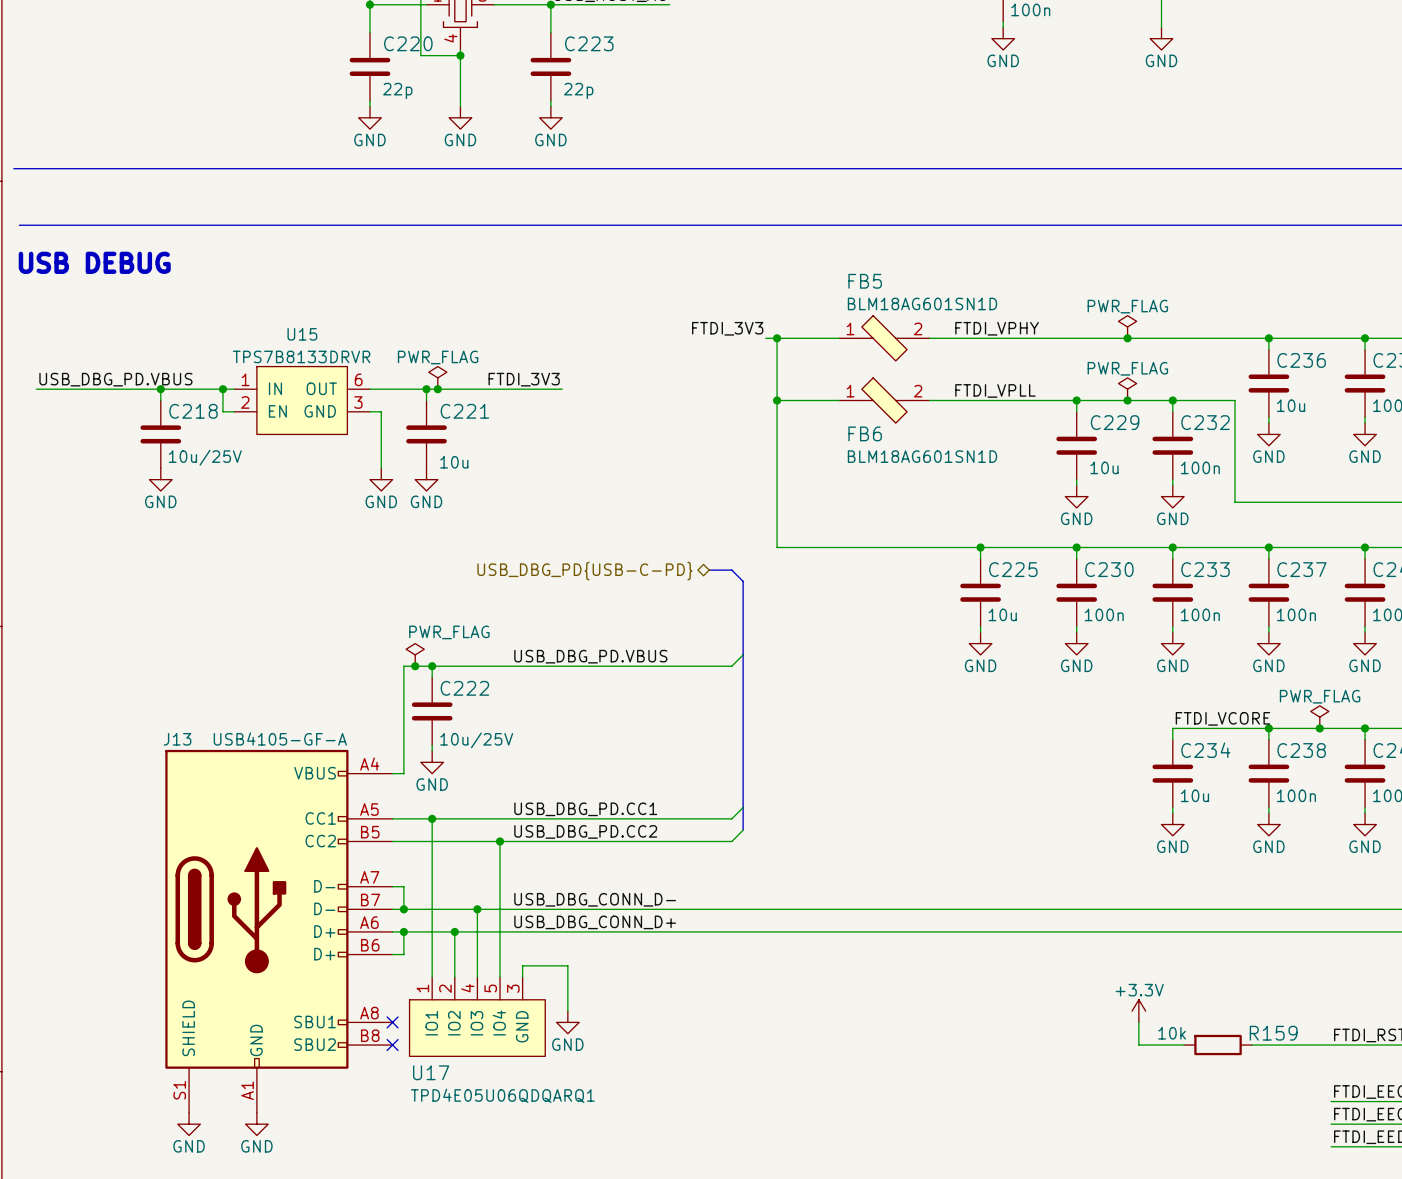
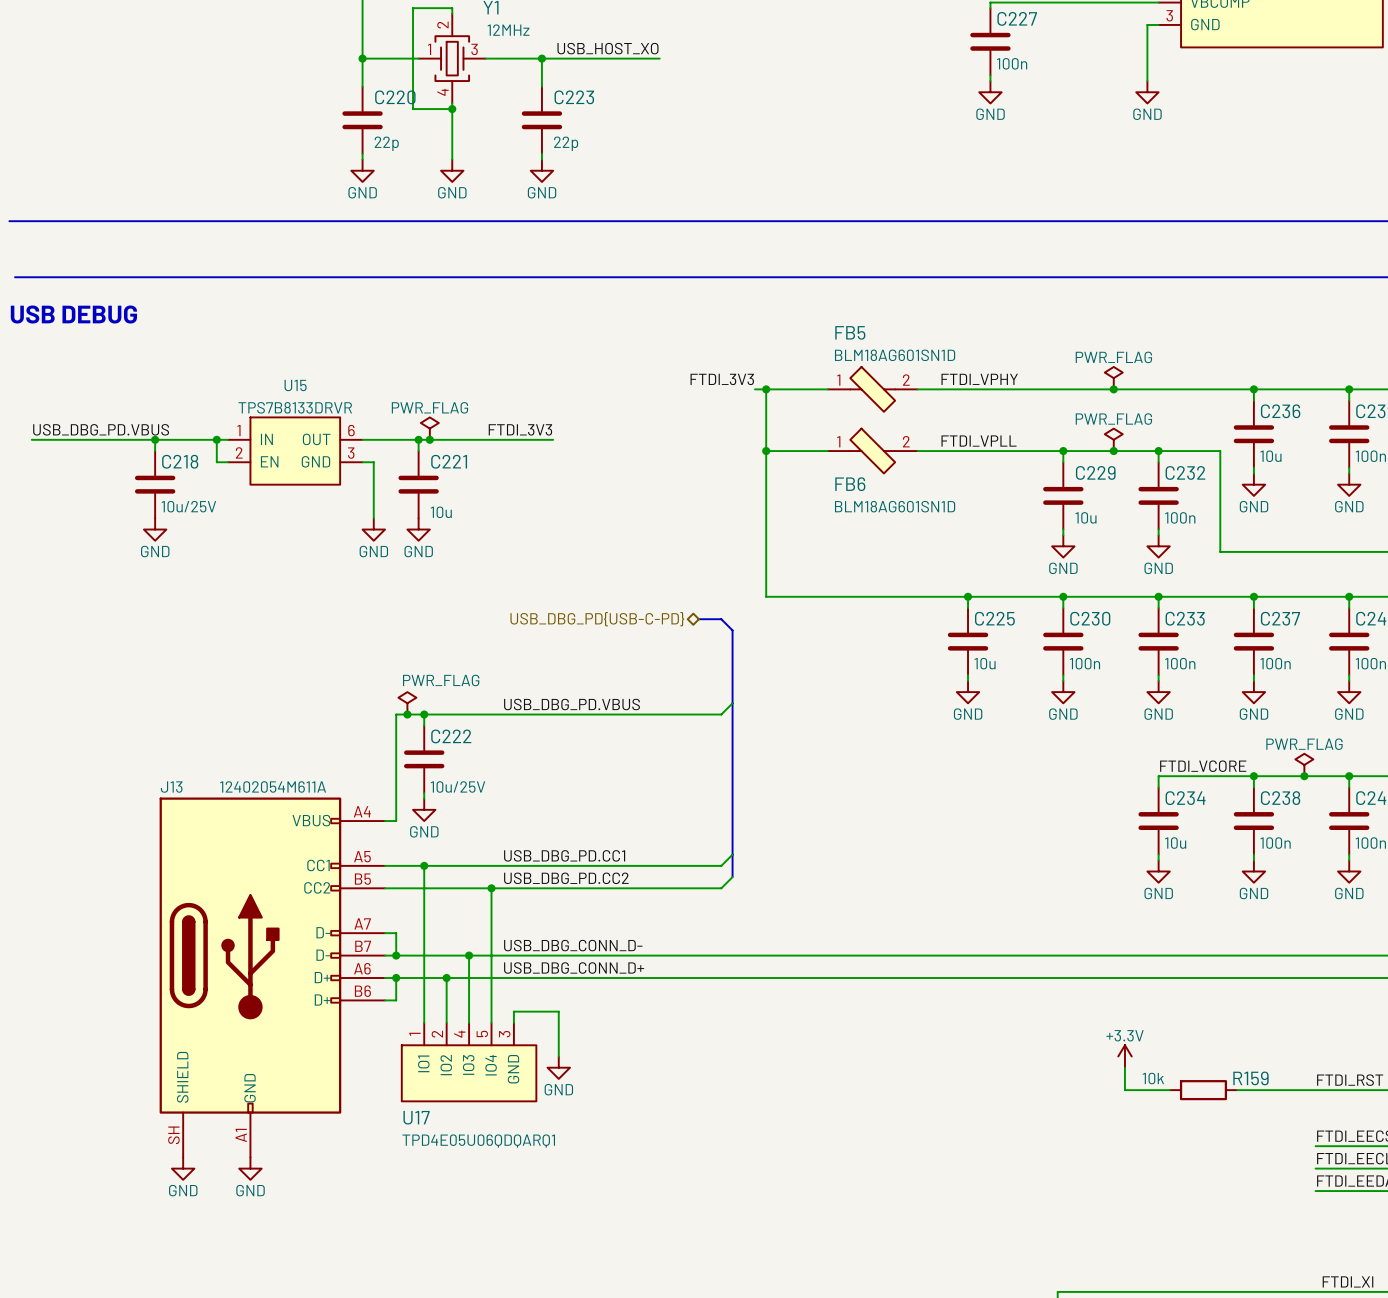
J13 value: USB4105-GF-A (280, 739) -> 12402054M611A (273, 786)
J13 symbol: [165, 749, 393, 1113] -> [159, 797, 385, 1158]
no-connect mark: (392, 1022) -> none
no-connect mark: (392, 1045) -> none

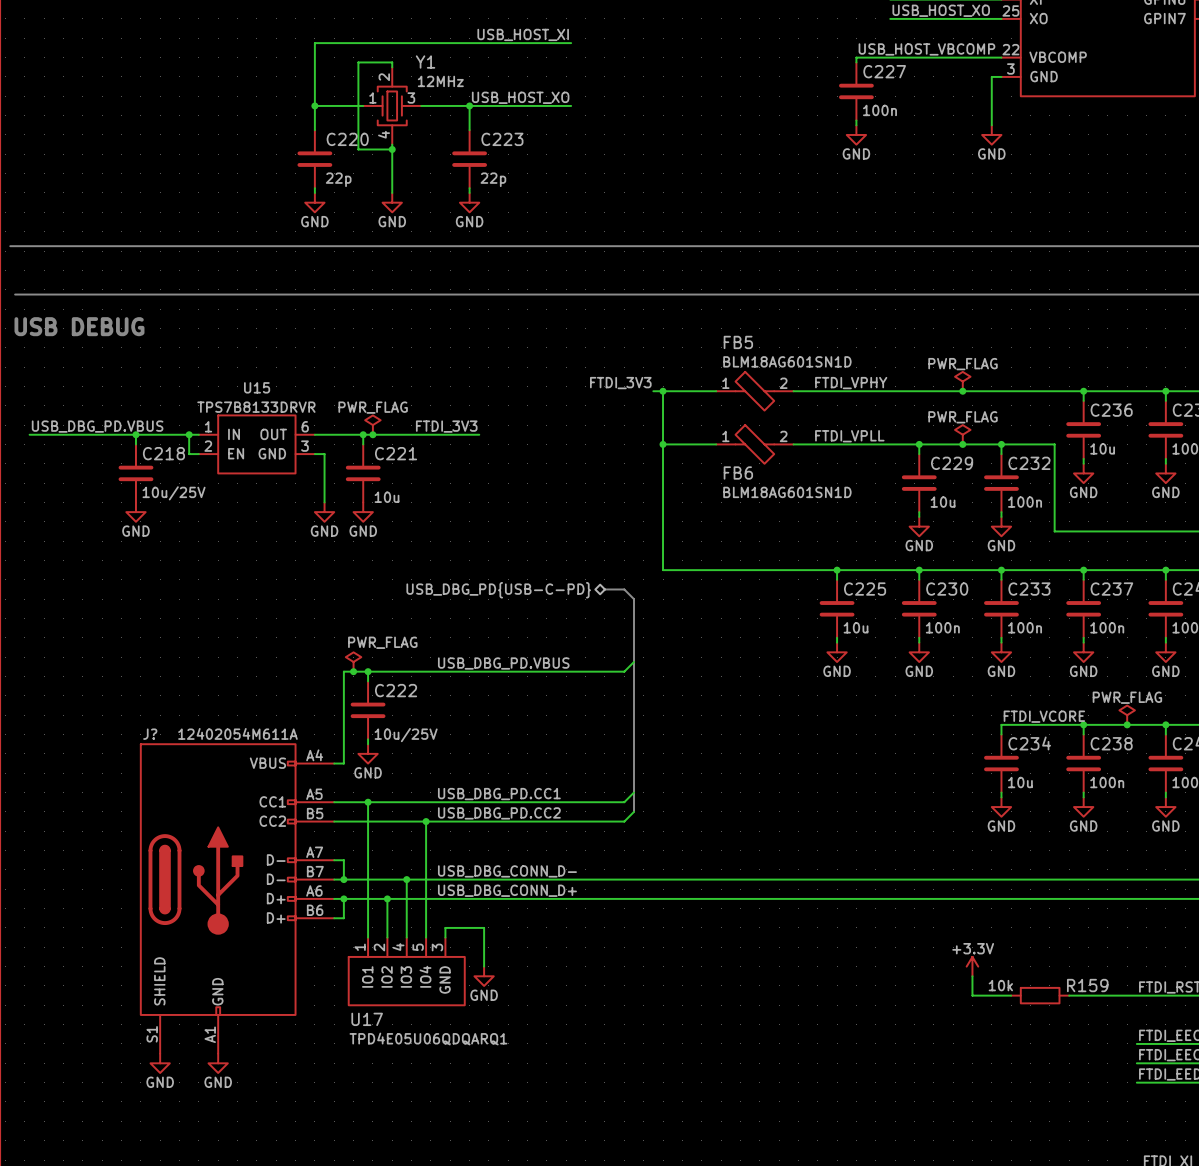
J13 name: J13 (171, 787) -> J? (150, 734)
J13 pin number: SH (173, 1135) -> S1 (152, 1034)

